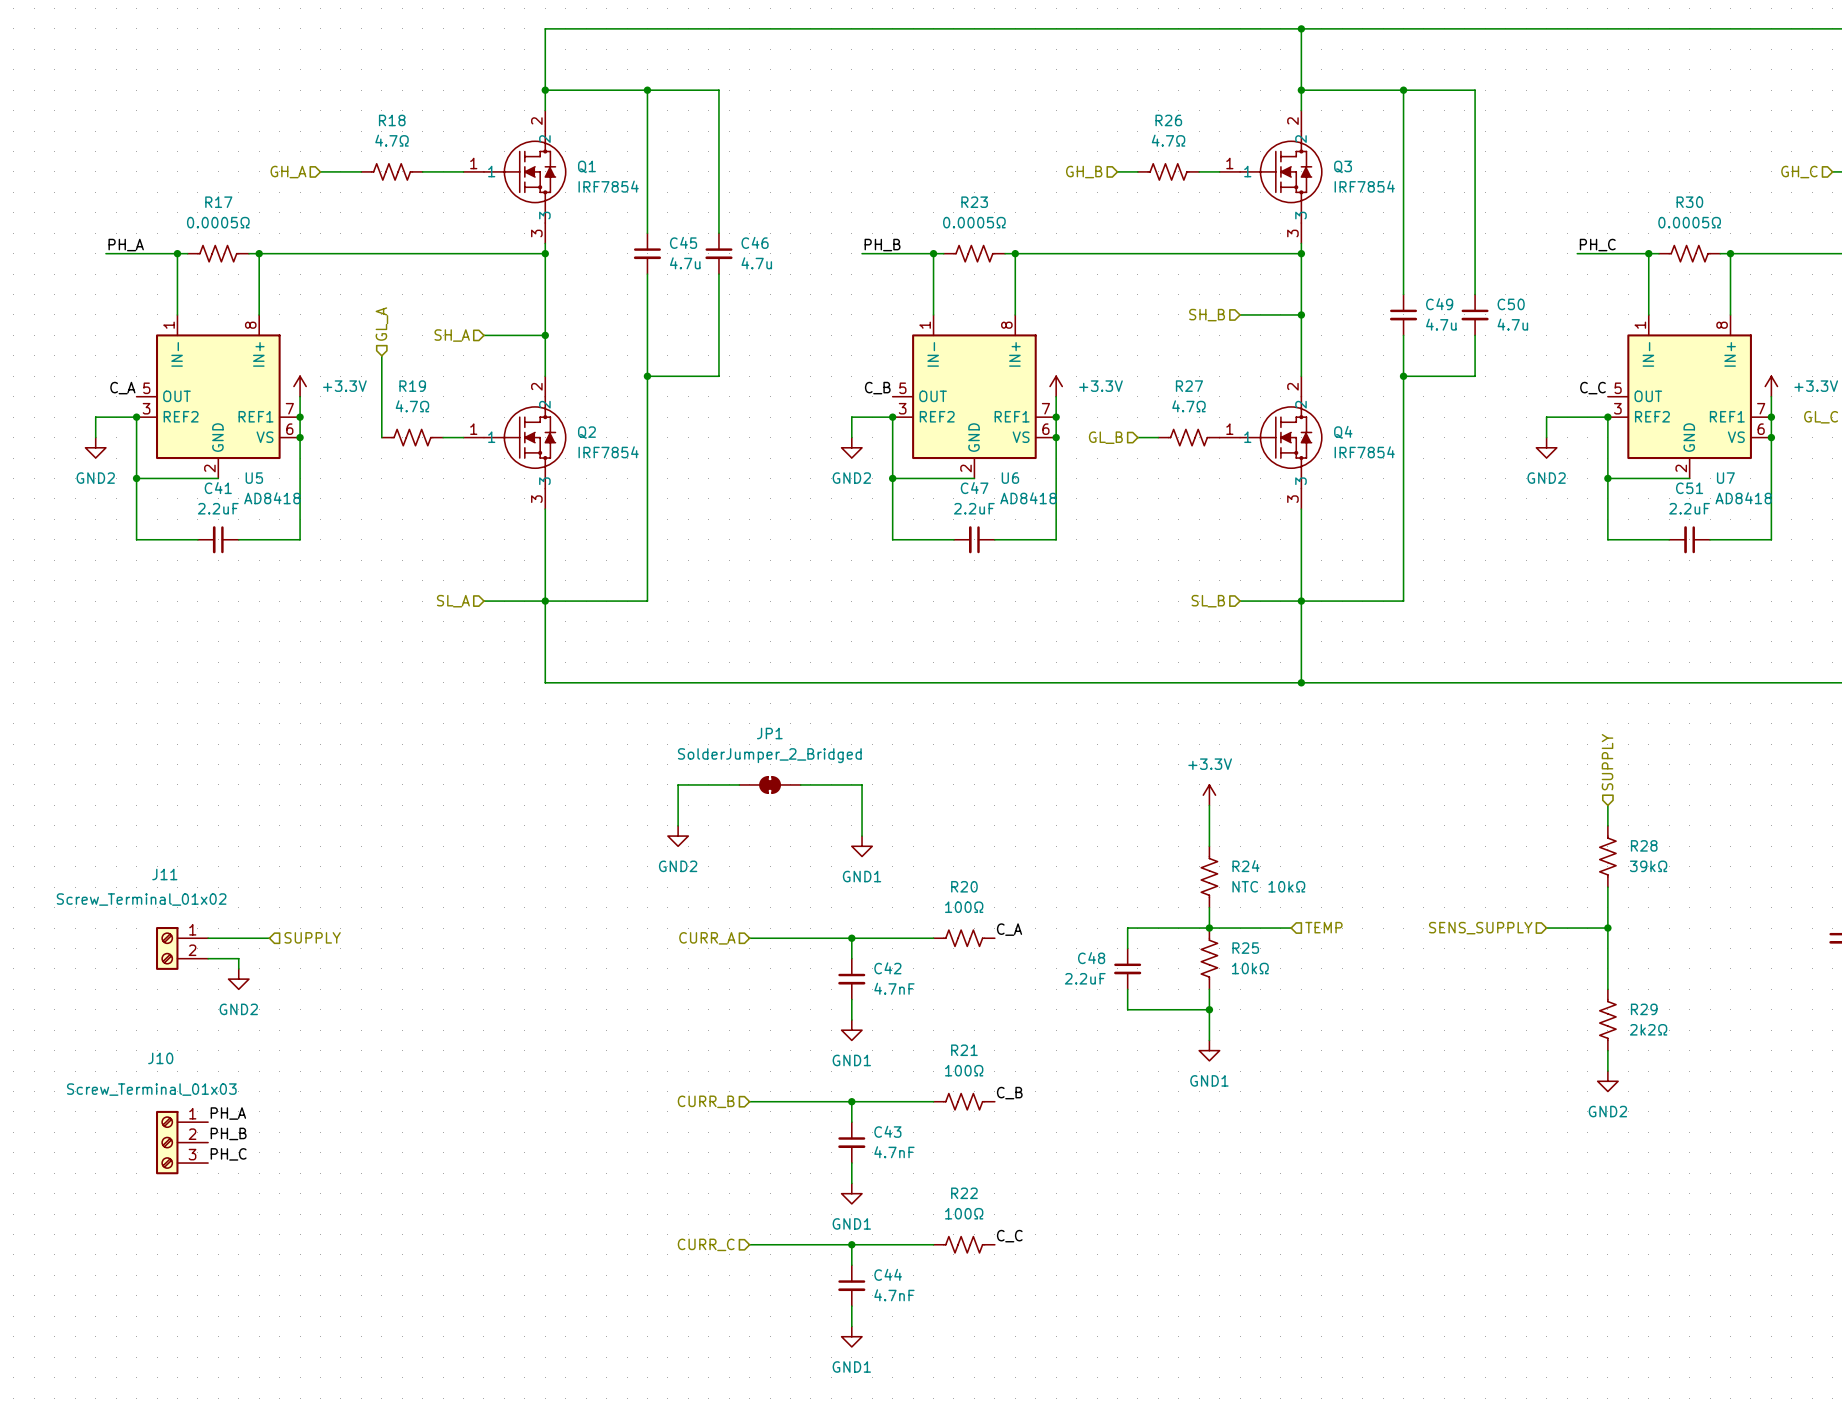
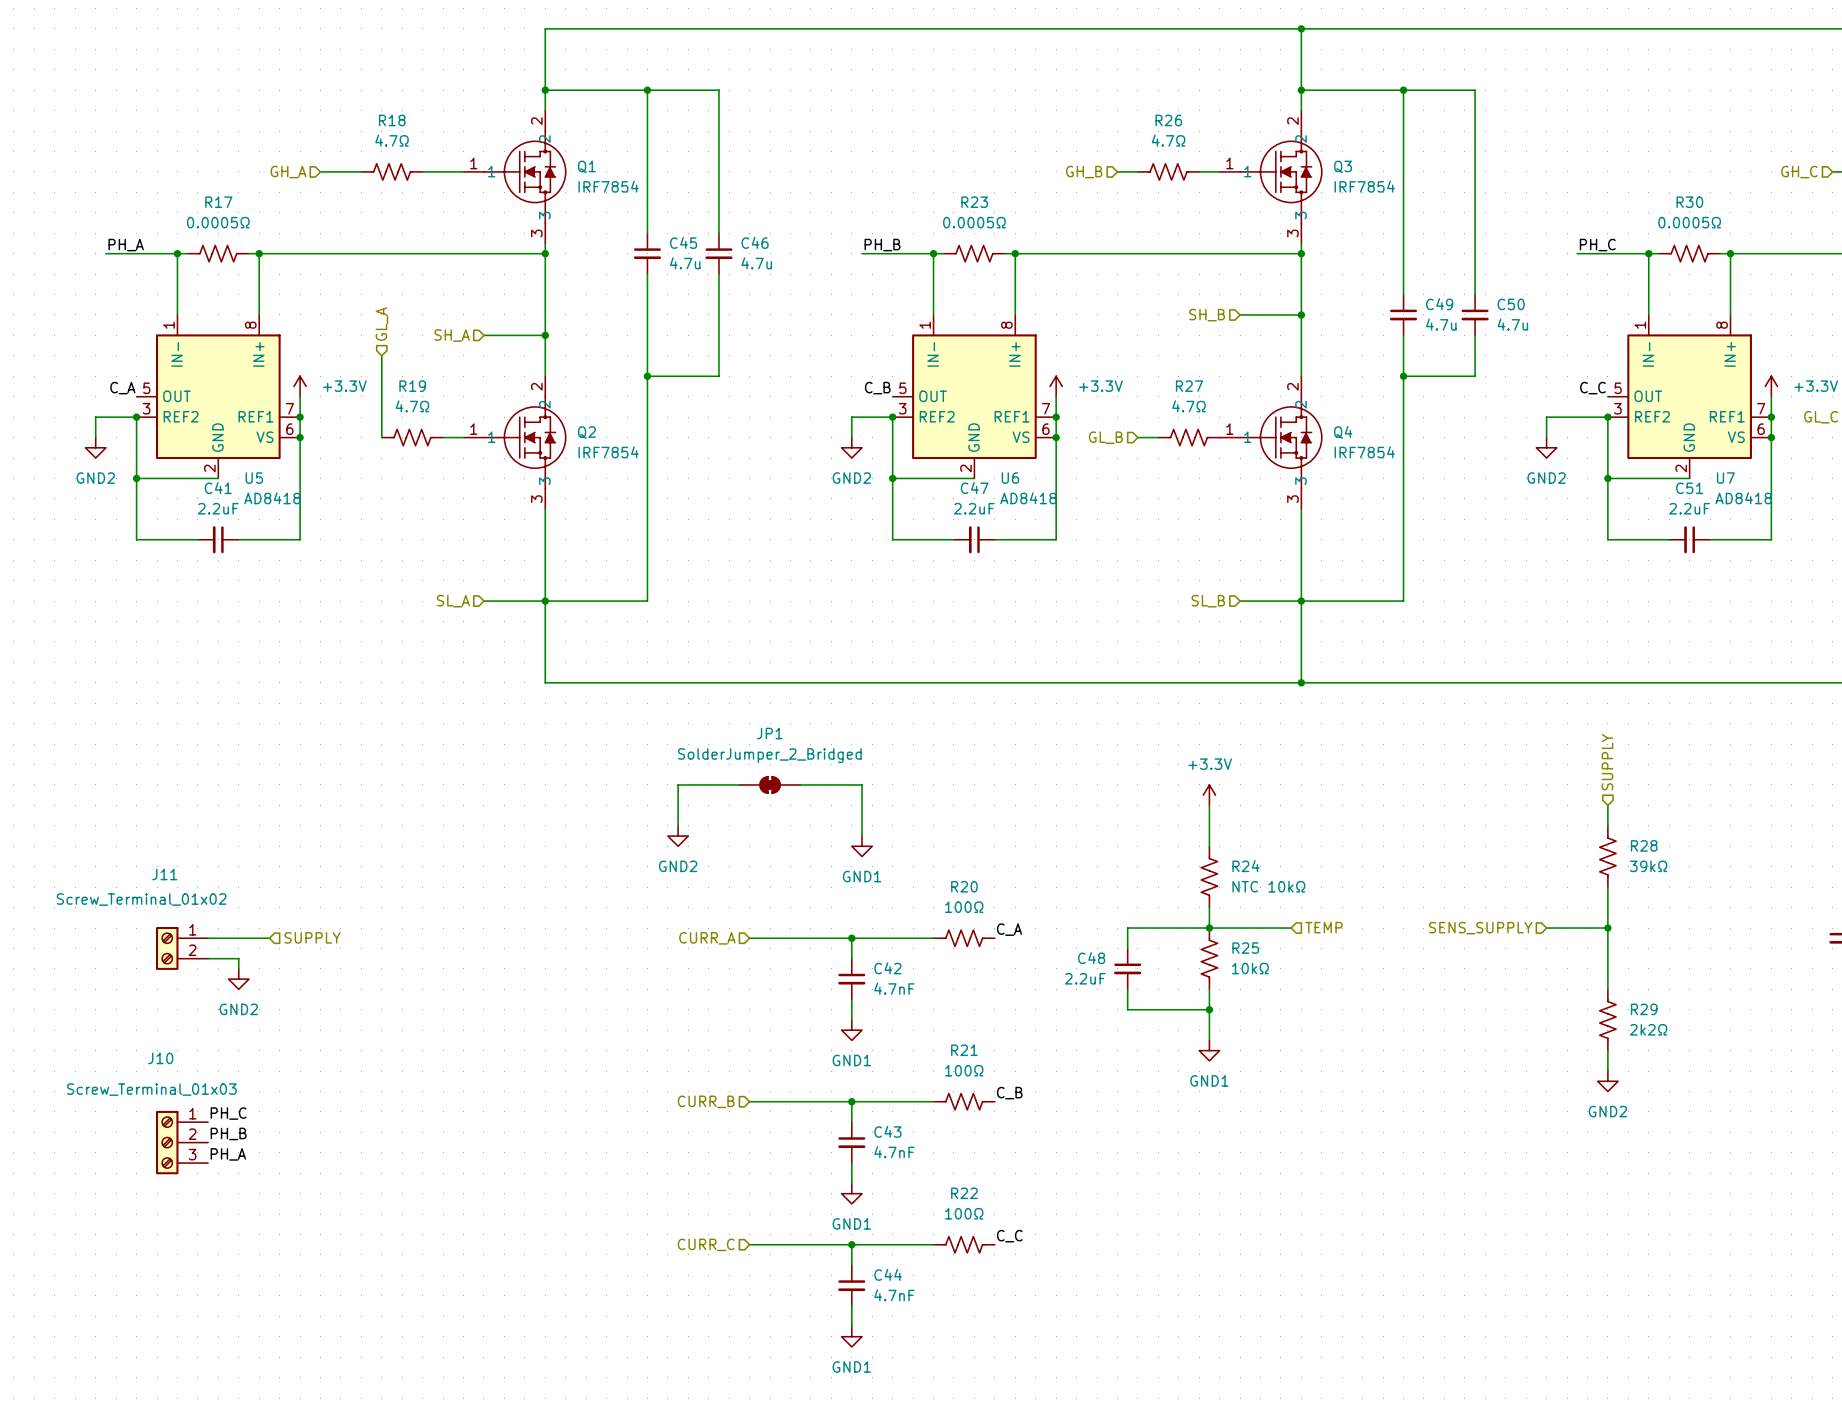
label: PH_A (228, 1113) -> PH_C (228, 1113)
label: PH_C (228, 1154) -> PH_A (228, 1154)

